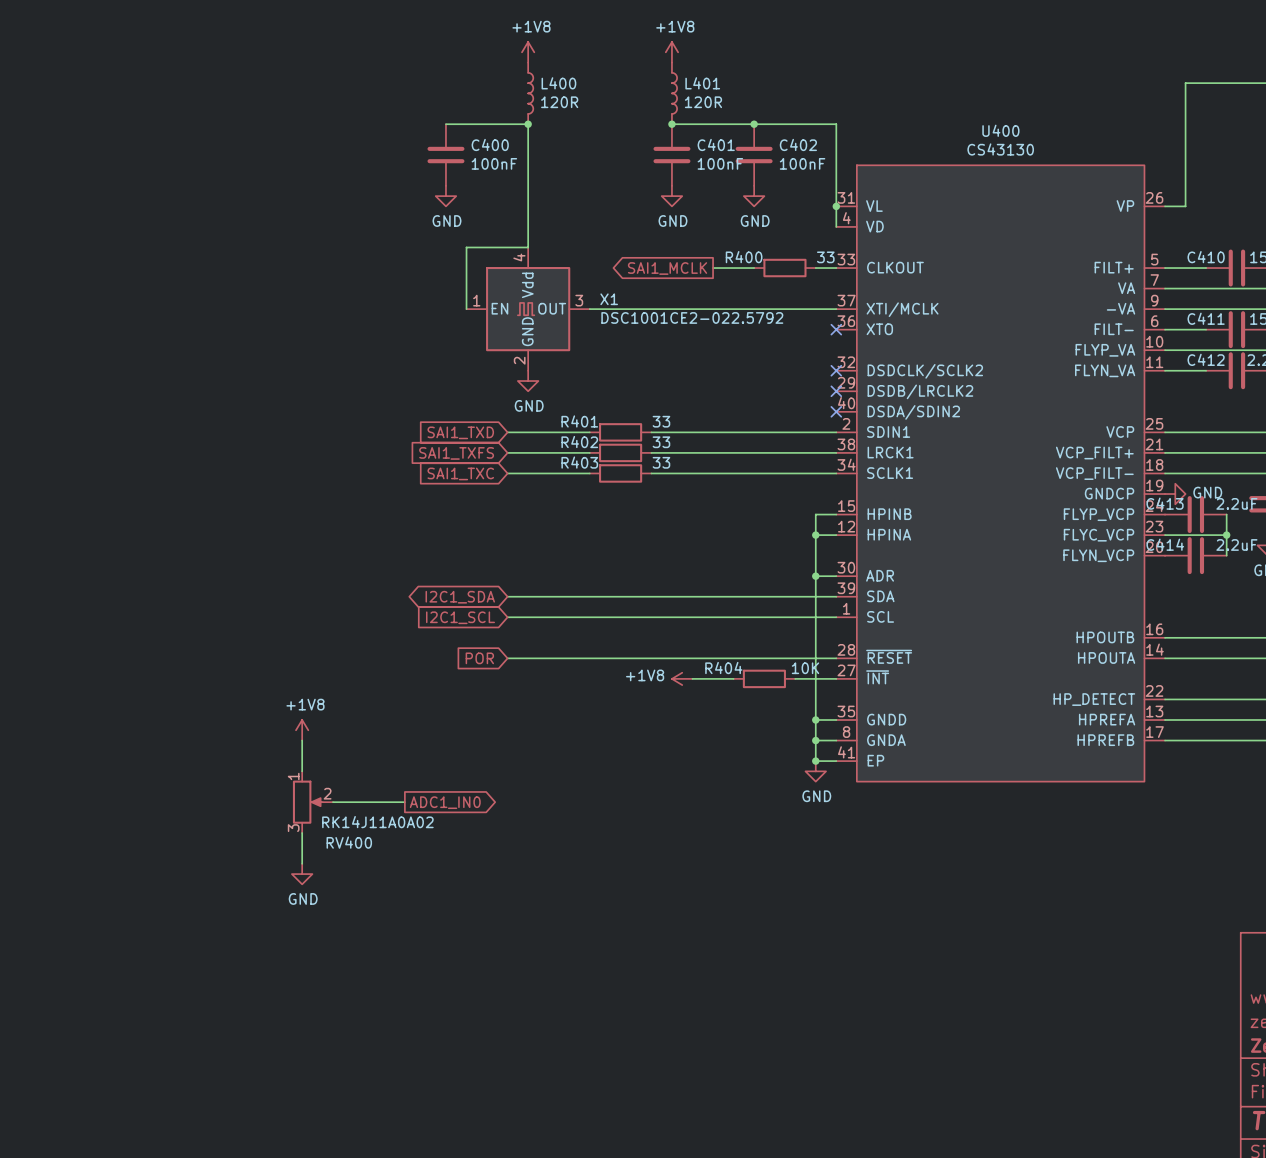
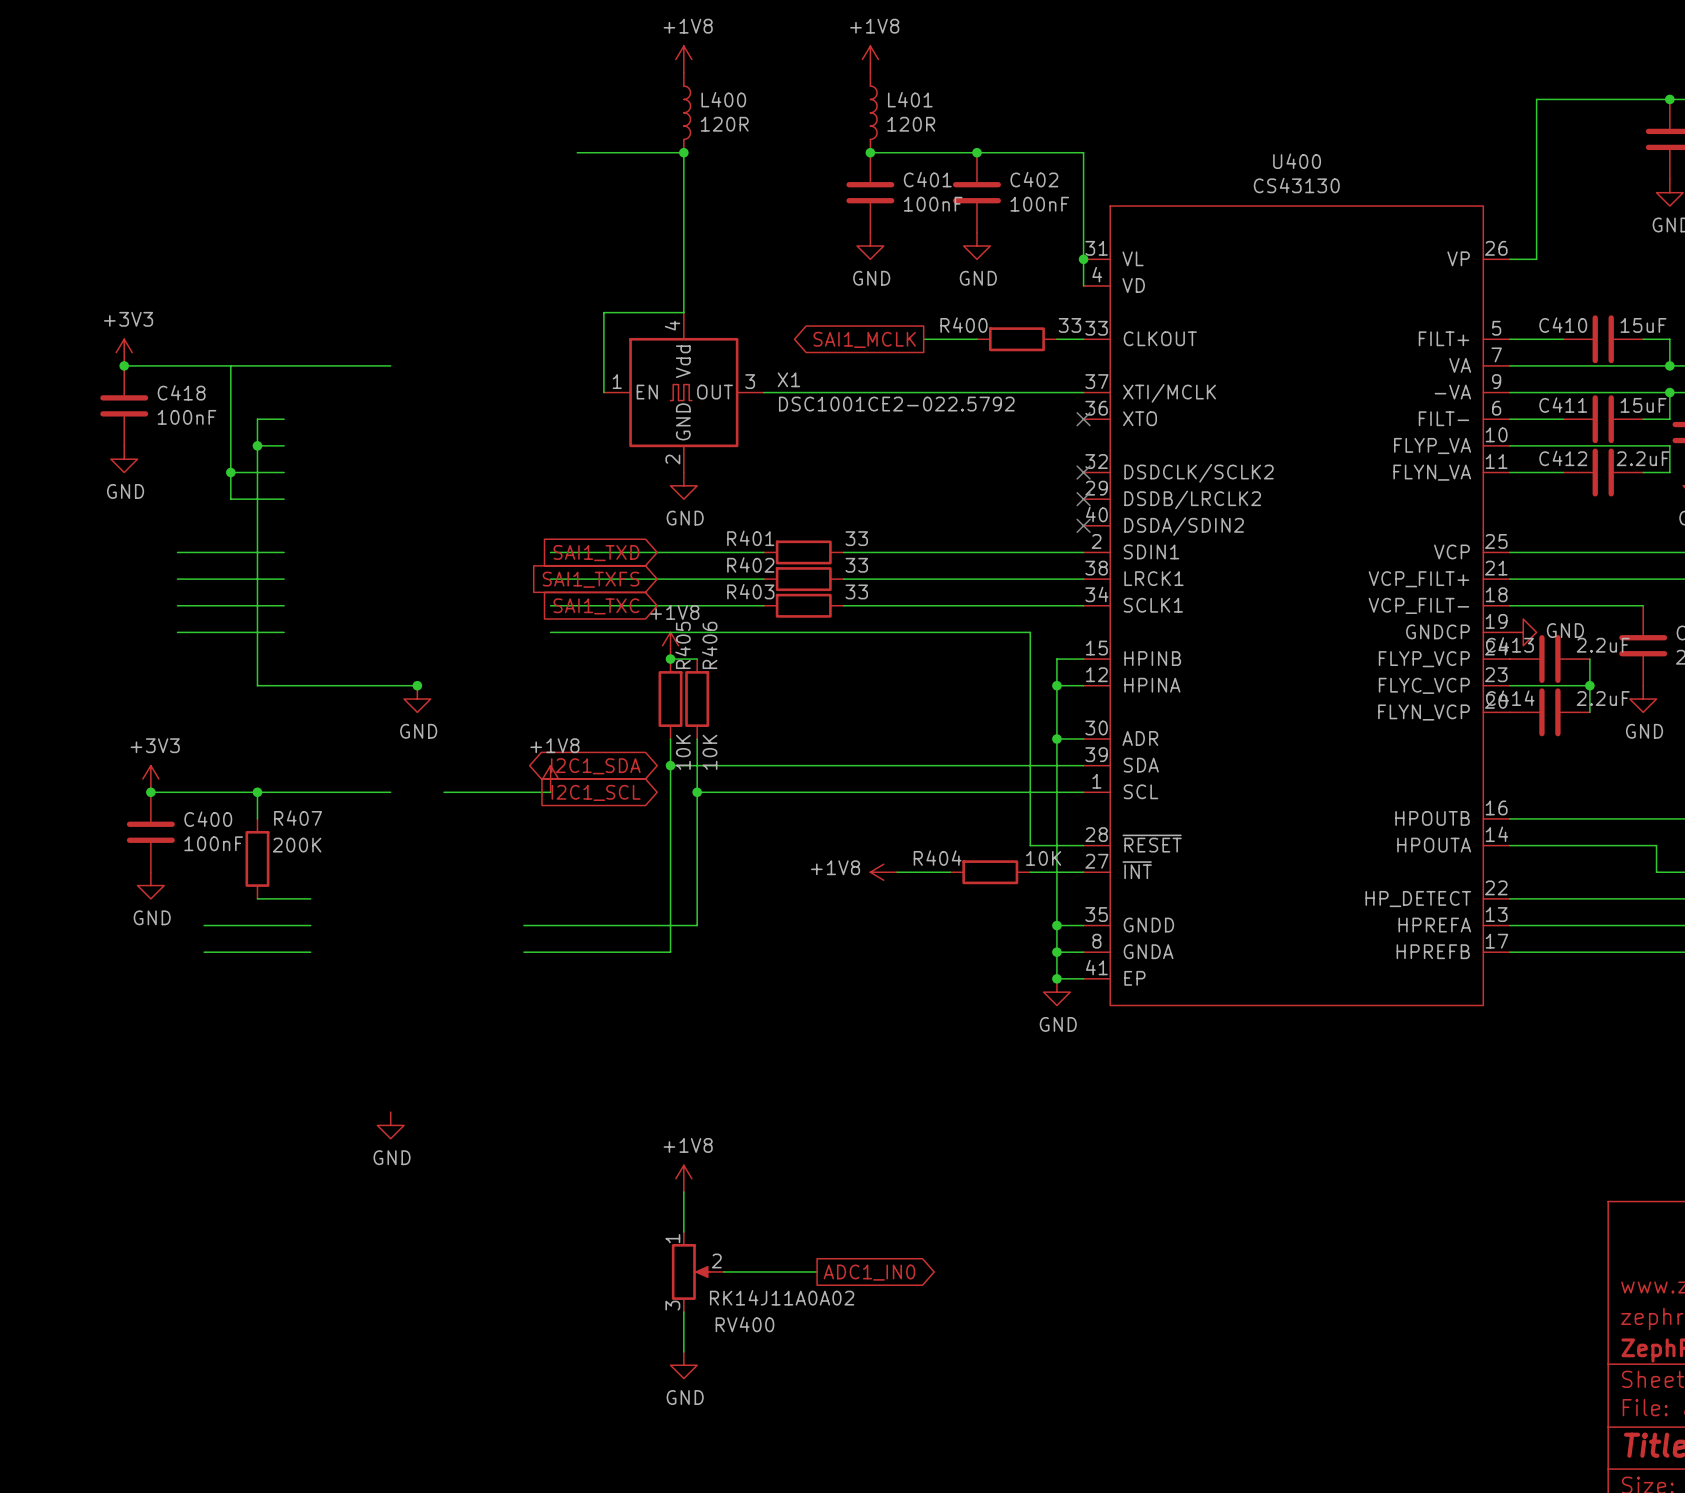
C400 position: (445, 155) -> (150, 832)
power symbol: GND (445, 196) -> none
power symbol: none -> +3V3 (124, 352)
wire: none -> (124, 365) (390, 365)
junction: none -> (124, 365)
wire: none -> (230, 365) (230, 499) (284, 499)
C418: none -> 100nF (124, 405)
wire: none -> (284, 419) (257, 419) (257, 685) (417, 685)
wire: none -> (257, 445) (284, 445)
junction: none -> (257, 445)
power symbol: none -> GND (124, 459)
wire: none -> (230, 472) (284, 472)
junction: none -> (230, 472)
wire: none -> (177, 552) (284, 552)
wire: none -> (550, 552) (657, 552)
wire: none -> (177, 579) (284, 579)
wire: none -> (550, 579) (657, 579)
wire: none -> (177, 605) (284, 605)
wire: none -> (550, 605) (657, 605)
wire: none -> (177, 632) (284, 632)
power symbol: none -> +1V8 (670, 645)
wire: none -> (670, 659) (697, 659)
junction: none -> (670, 659)
junction: none -> (417, 685)
power symbol: none -> GND (417, 699)
R405: none -> 10K (670, 699)
R406: none -> 10K (697, 699)
wire: none -> (670, 739) (670, 952) (523, 952)
wire: none -> (697, 739) (697, 925) (523, 925)
wire: (507, 596) (517, 596) -> none
junction: none -> (670, 765)
power symbol: none -> +3V3 (150, 778)
power symbol: none -> +1V8 (550, 778)
wire: none -> (150, 792) (390, 792)
junction: none -> (150, 792)
wire: none -> (257, 792) (257, 818)
junction: none -> (257, 792)
wire: none -> (444, 792) (550, 792)
wire: (507, 617) (538, 617) -> none
junction: none -> (697, 792)
global label: POR (479, 658) -> none
wire: (507, 658) (795, 658) -> (550, 632) (1030, 632) (1030, 845)
R407: none -> 200K (257, 858)
power symbol: none -> GND (150, 885)
wire: none -> (257, 898) (310, 898)
wire: none -> (204, 925) (310, 925)
power symbol: +1V8 (302, 730) -> none
wire: none -> (204, 952) (310, 952)
wire: (302, 740) (302, 771) -> none
RV400 position: (312, 802) -> (697, 1271)
wire: (332, 802) (404, 802) -> none
global label: ADC1_IN0 (445, 802) -> none
wire: (302, 832) (302, 863) -> none
power symbol: none -> +1V8 (683, 1178)
wire: none -> (683, 1192) (683, 1232)
wire: none -> (723, 1271) (817, 1271)
global label: none -> ADC1_IN0 (869, 1272)
wire: none -> (683, 1311) (683, 1351)
power symbol: none -> GND (683, 1365)

